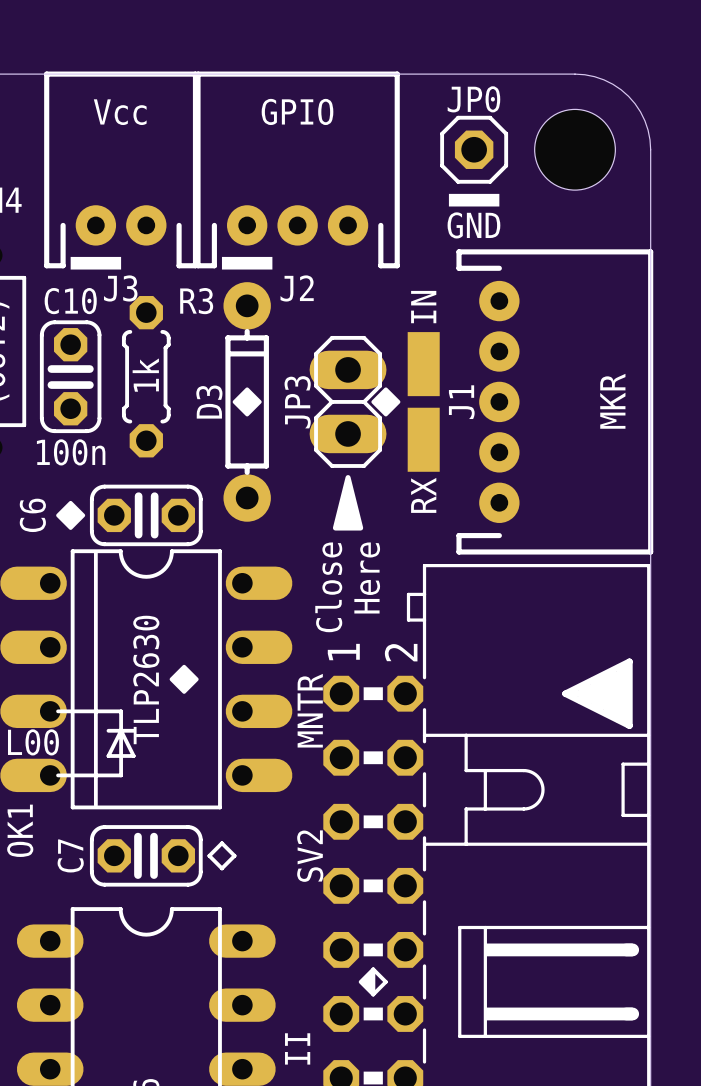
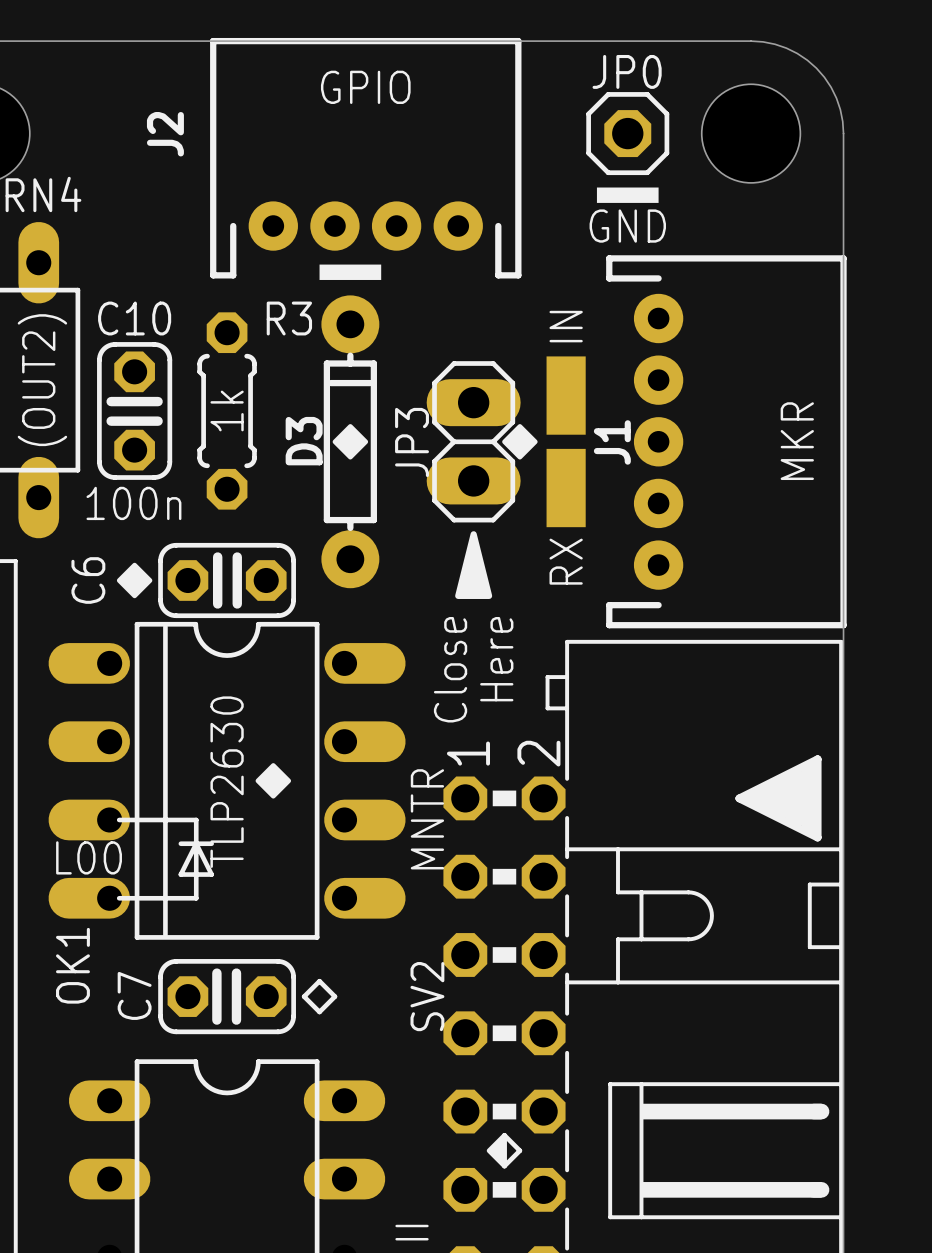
J2 footprint: [195, 71, 400, 269] -> [210, 37, 522, 279]
text position: GPIO (297, 111) -> GPIO (365, 87)
text: Vcc (120, 112) -> none
J3: (121, 169) -> none
drawing: [70, 256, 122, 270] -> none
J2 name position: J2 (297, 288) -> J2 (165, 134)

